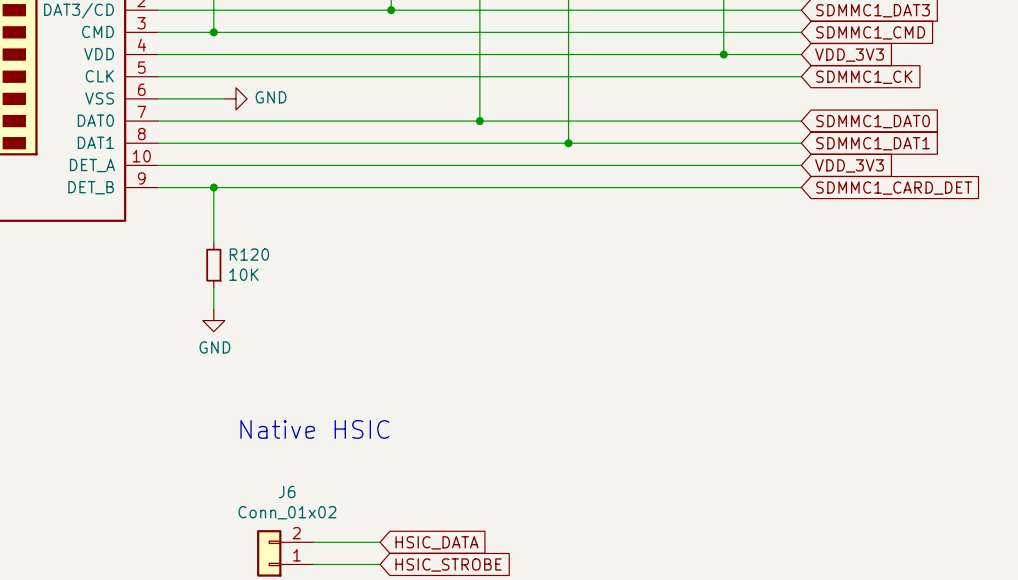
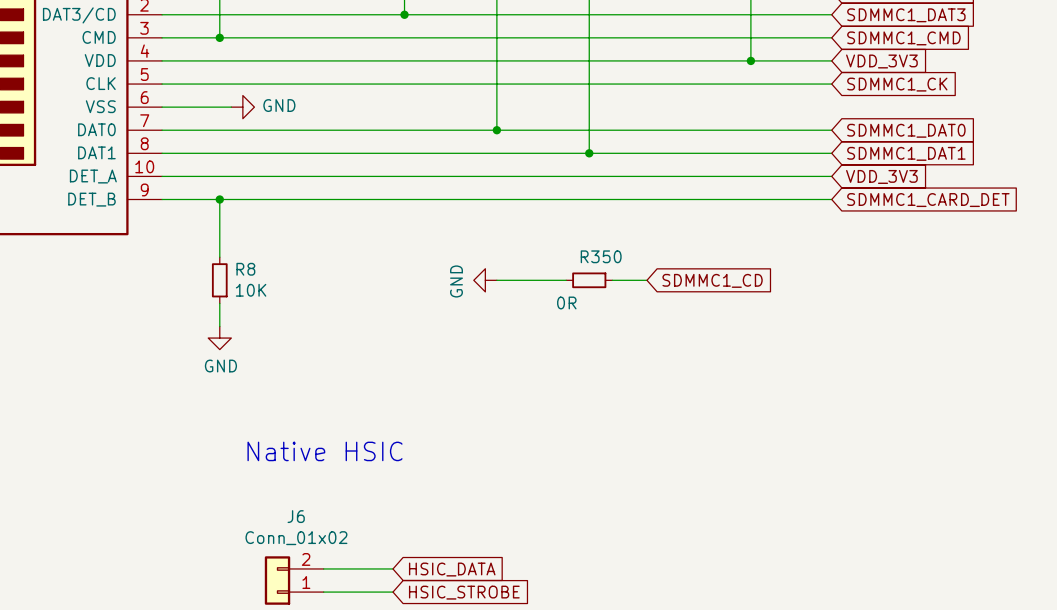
R120 name: R120 (249, 254) -> R8 (245, 269)
power symbol: none -> GND (485, 280)
wire: none -> (496, 280) (566, 280)
R350: none -> 0R (589, 280)
wire: none -> (612, 280) (646, 280)
global label: none -> SDMMC1_CD (712, 280)

